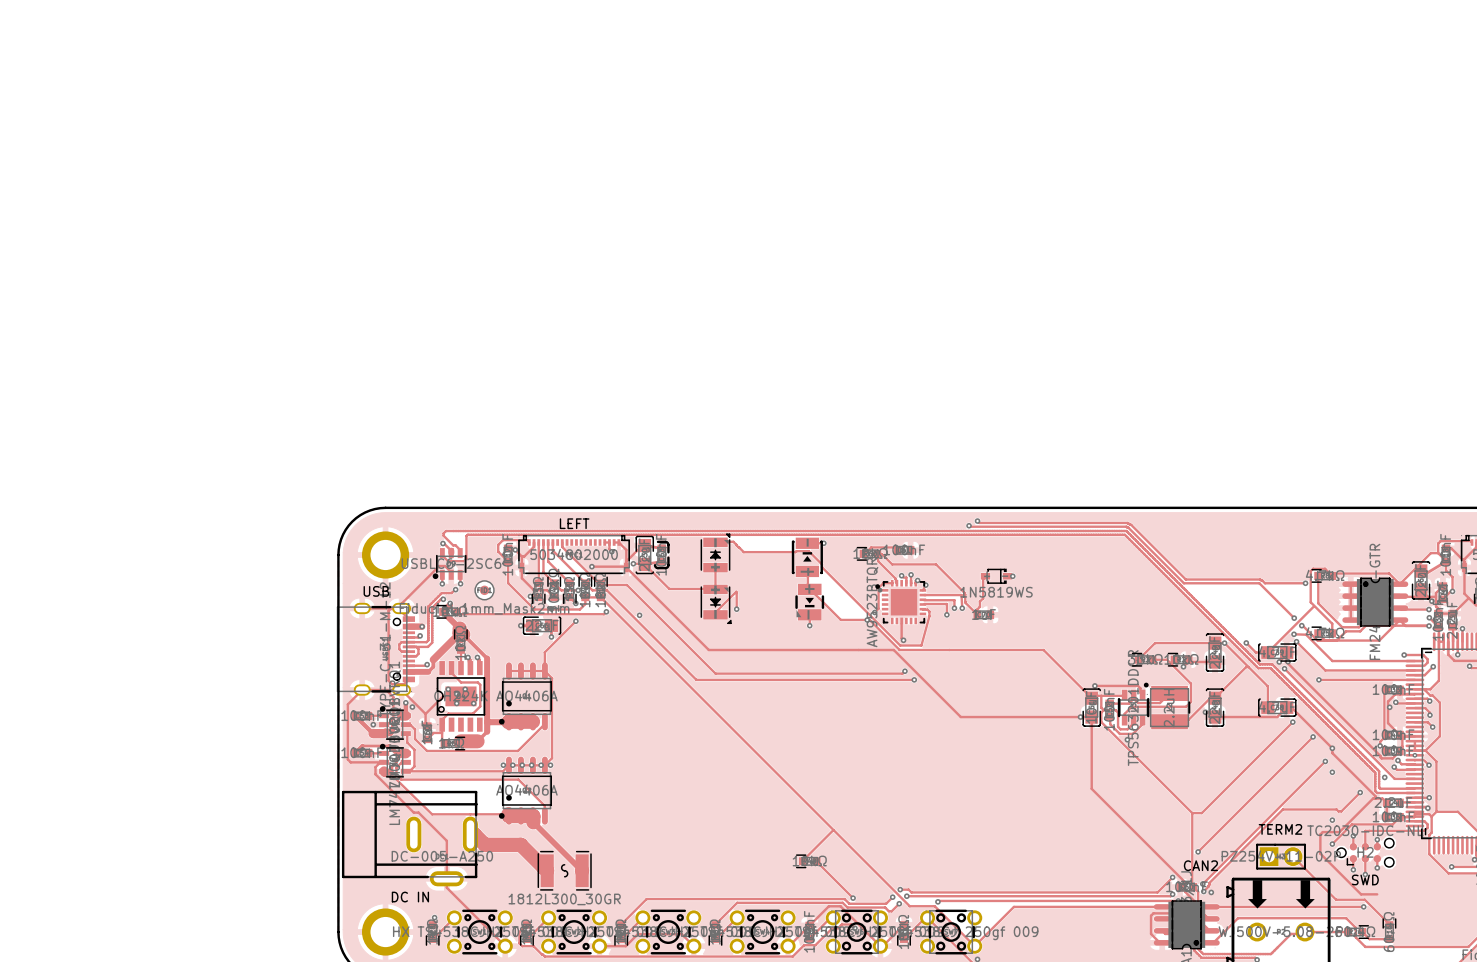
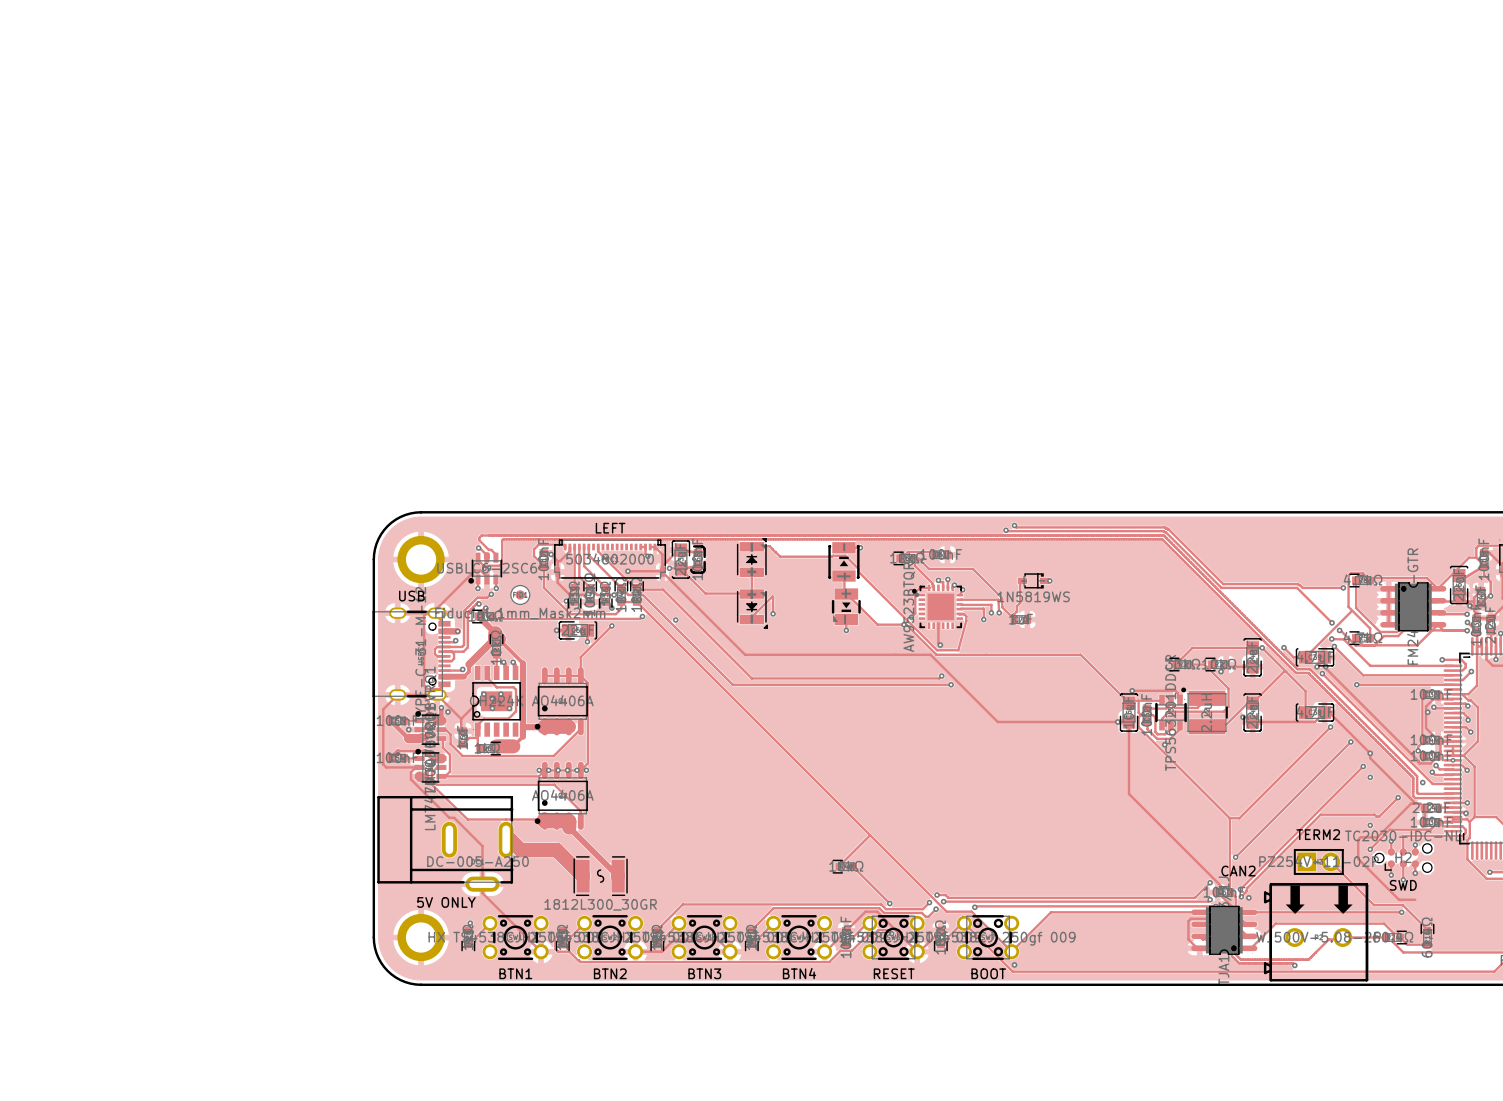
text: DC IN (410, 897) -> 5V ONLY (446, 902)

